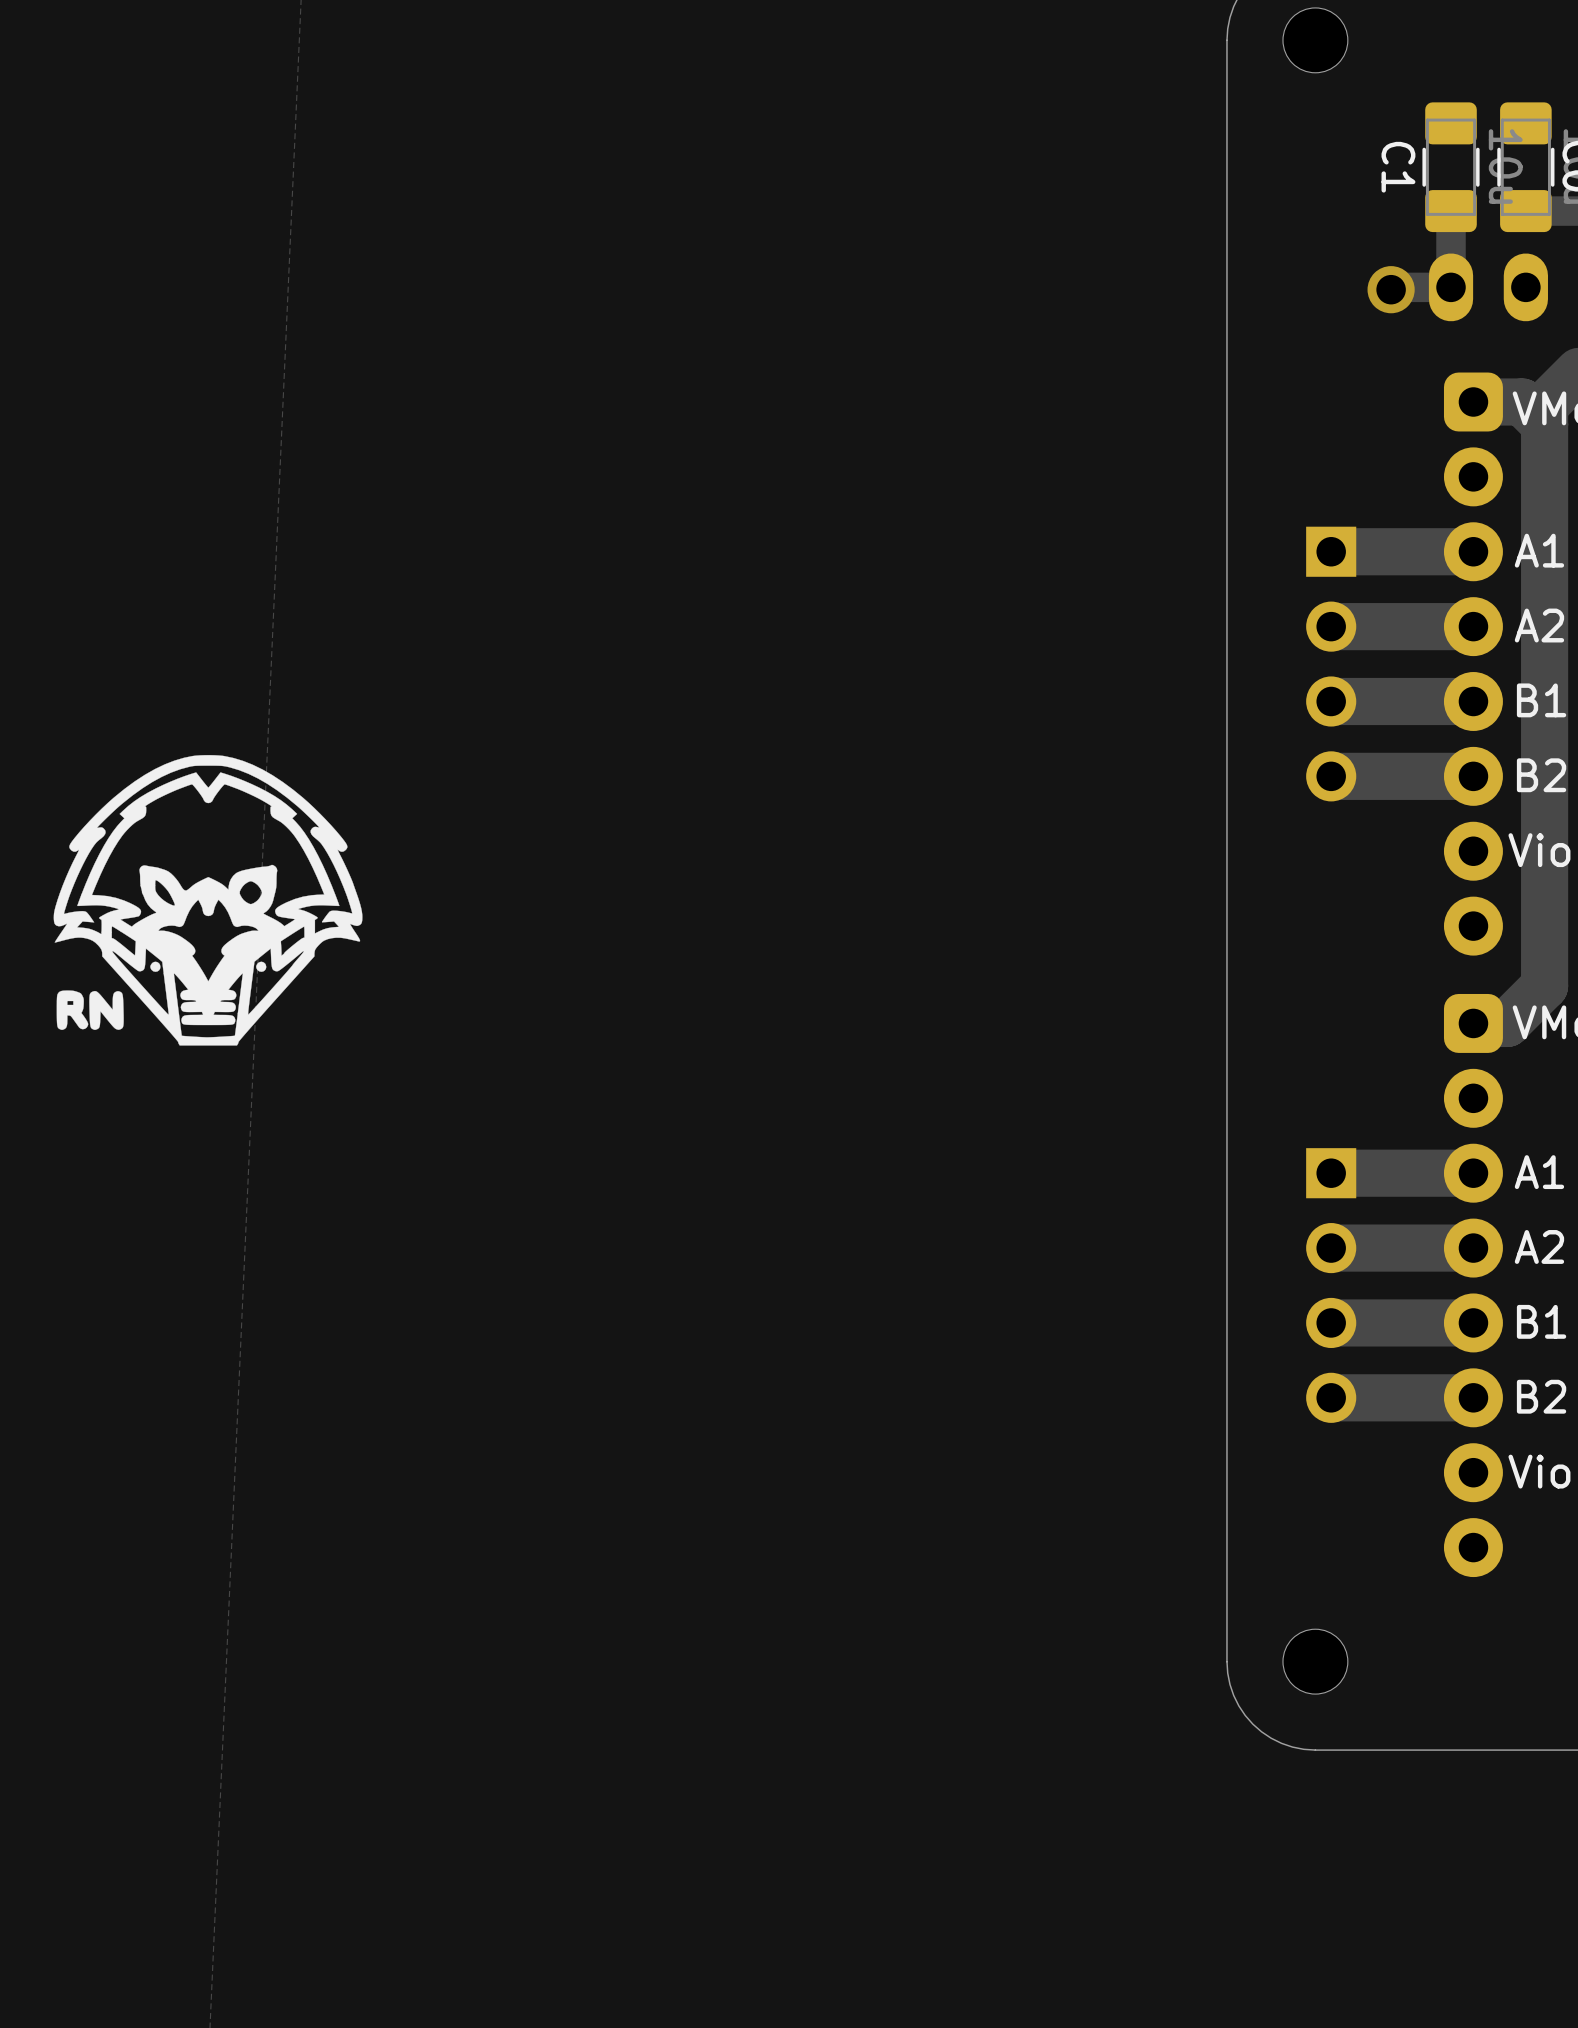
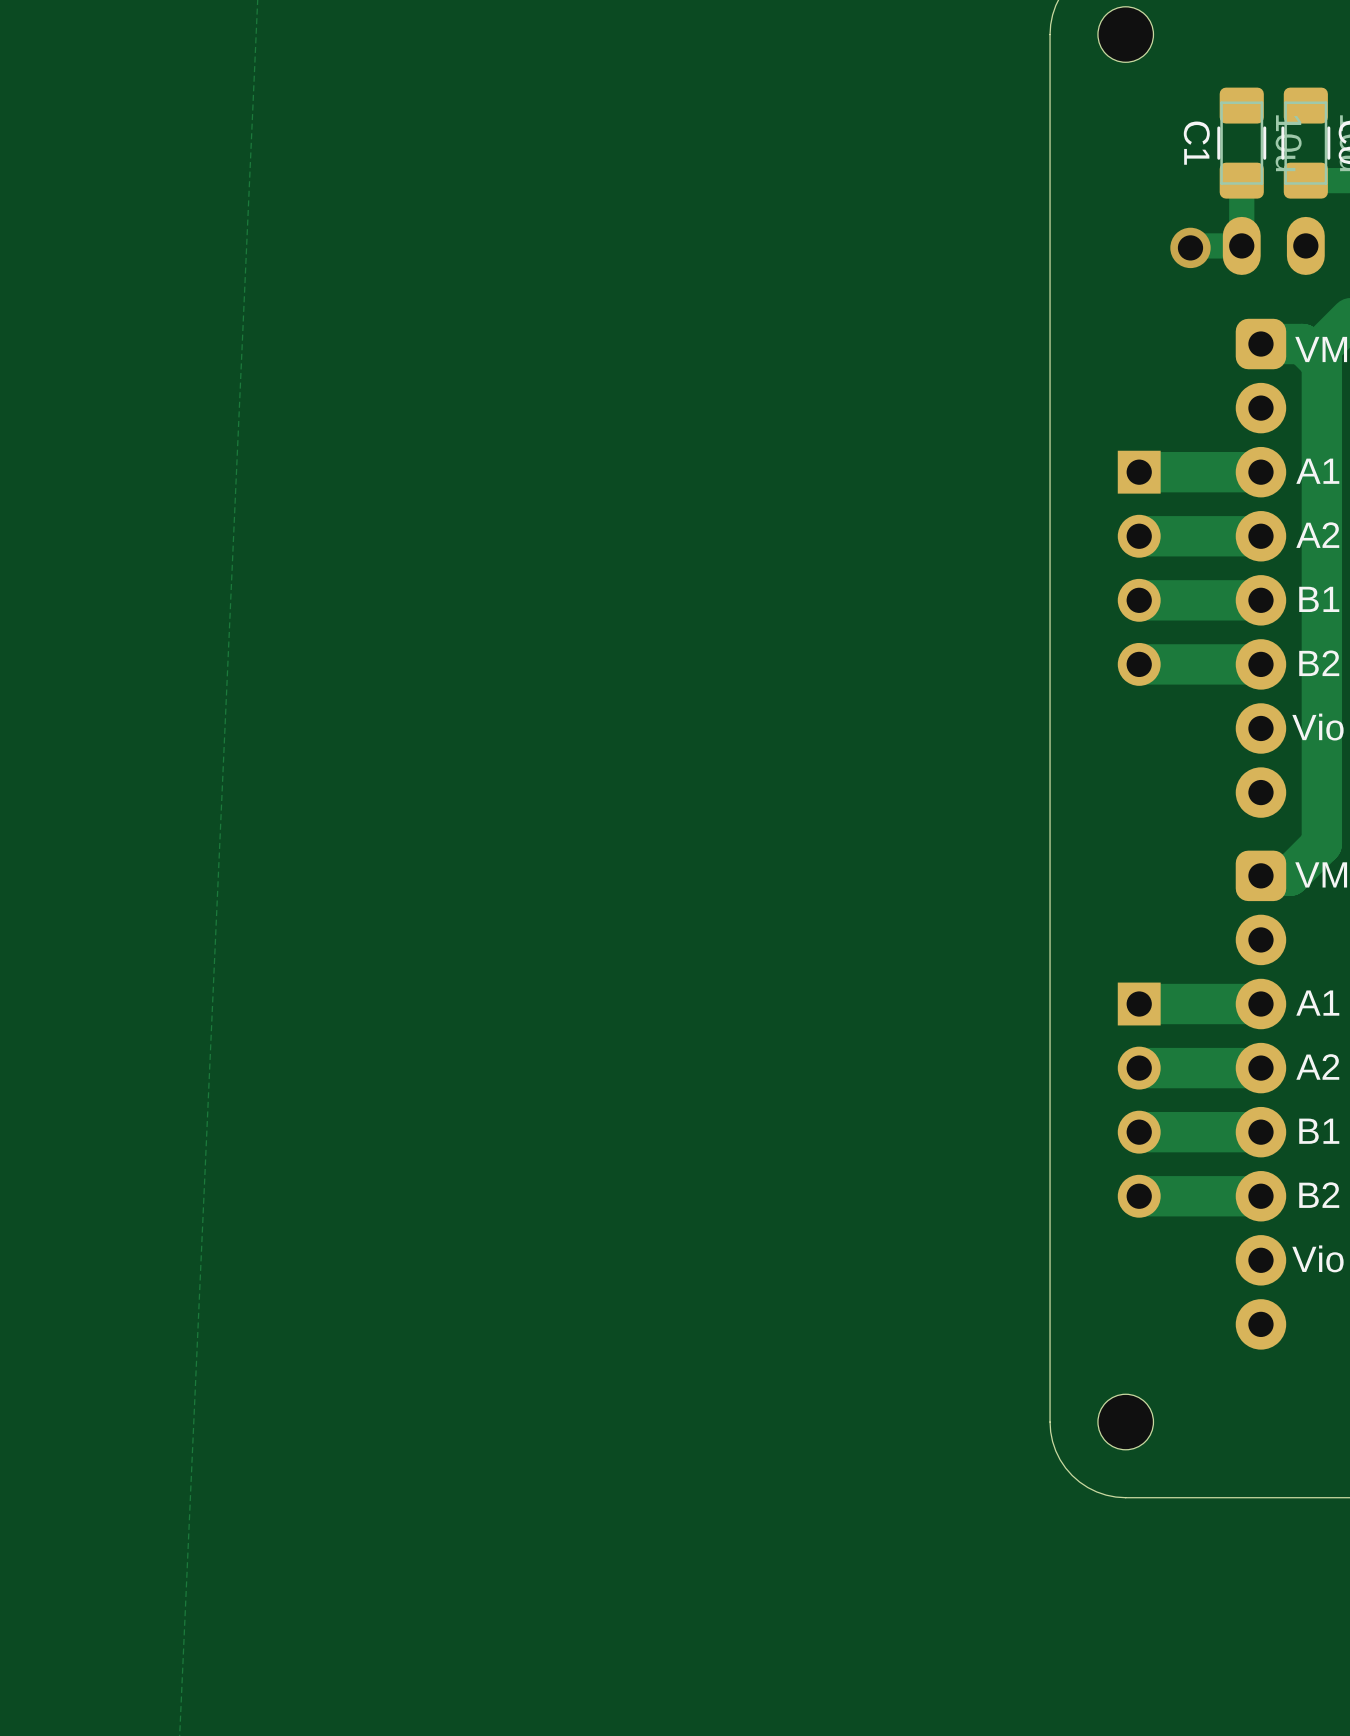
drawing: [53, 755, 363, 1046] -> none

